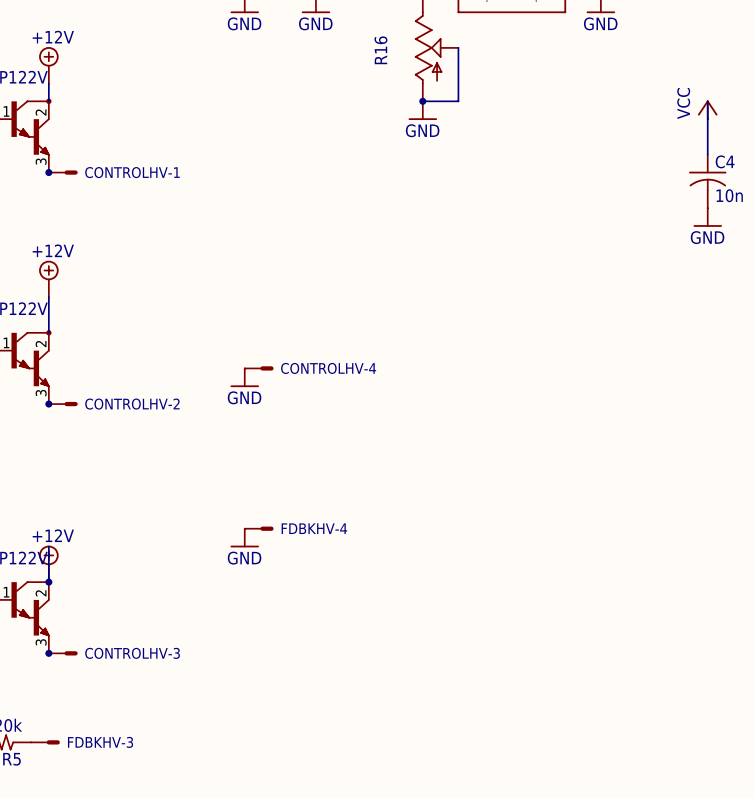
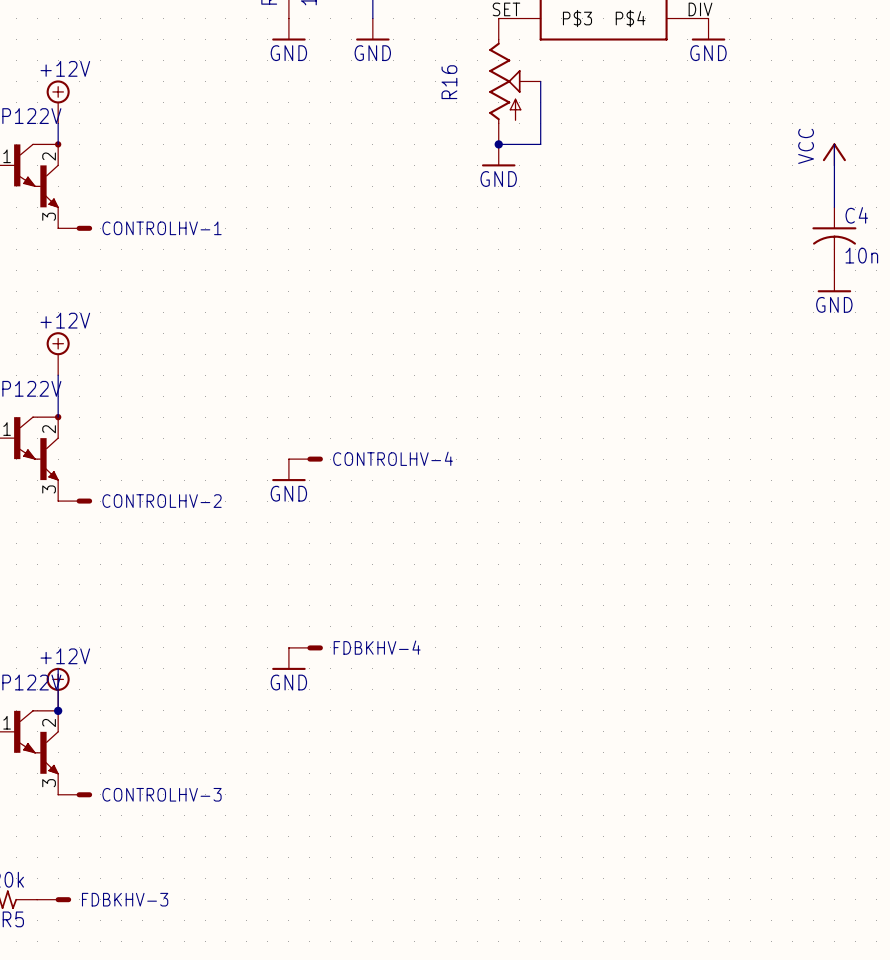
junction: (48, 172) -> none
junction: (48, 404) -> none
junction: (48, 653) -> none

